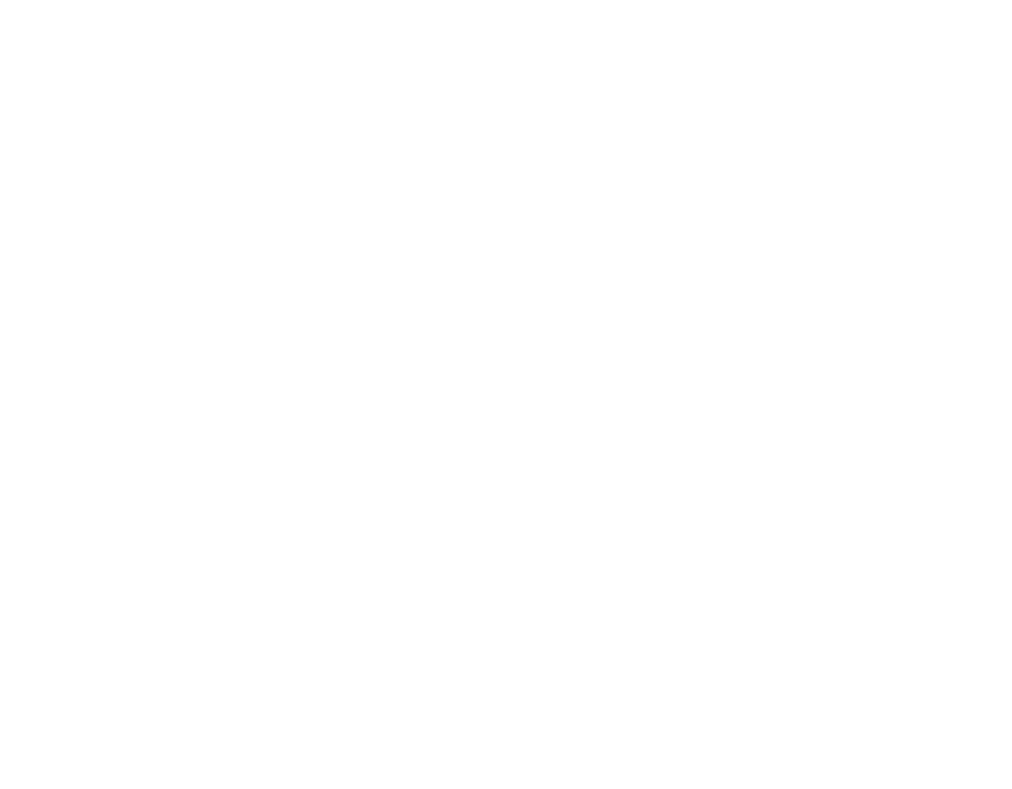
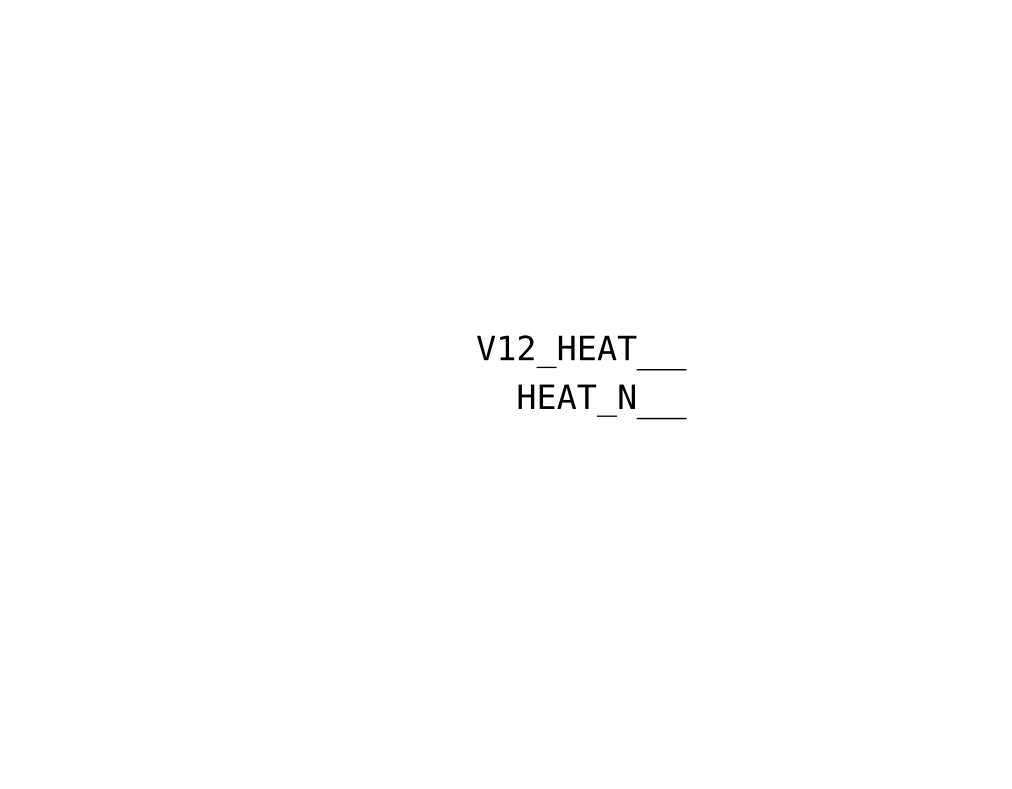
label: none -> V12_HEAT (556, 351)
wire: none -> (637, 369) (686, 369)
label: none -> HEAT_N (576, 400)
wire: none -> (637, 418) (686, 418)

